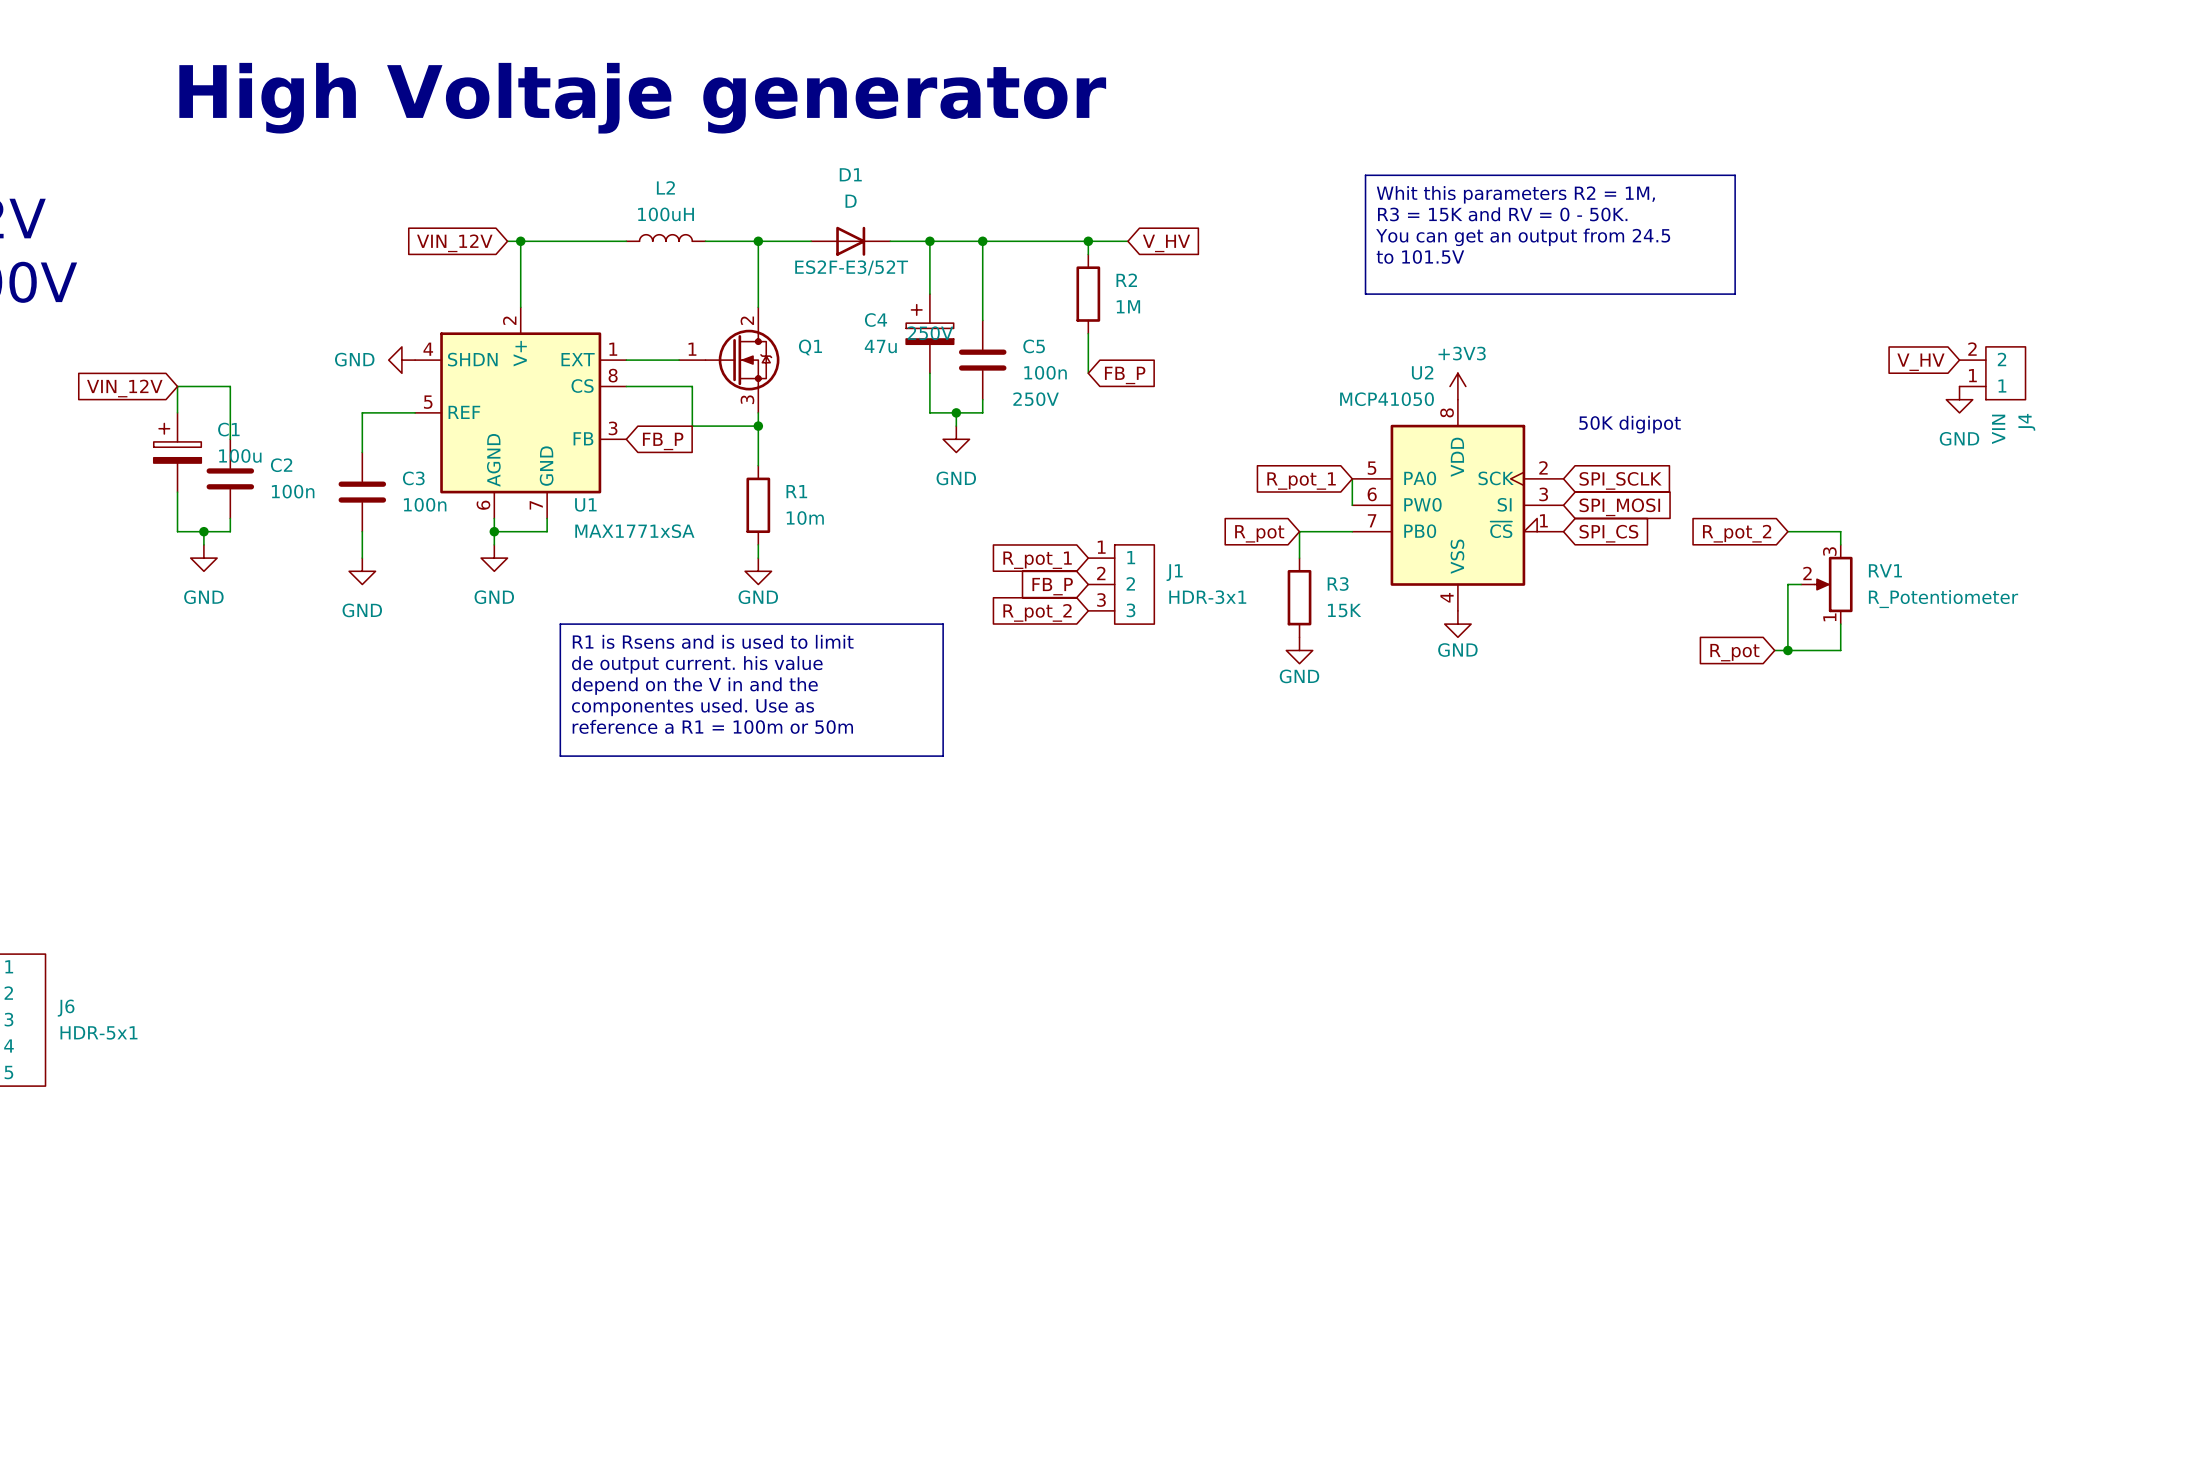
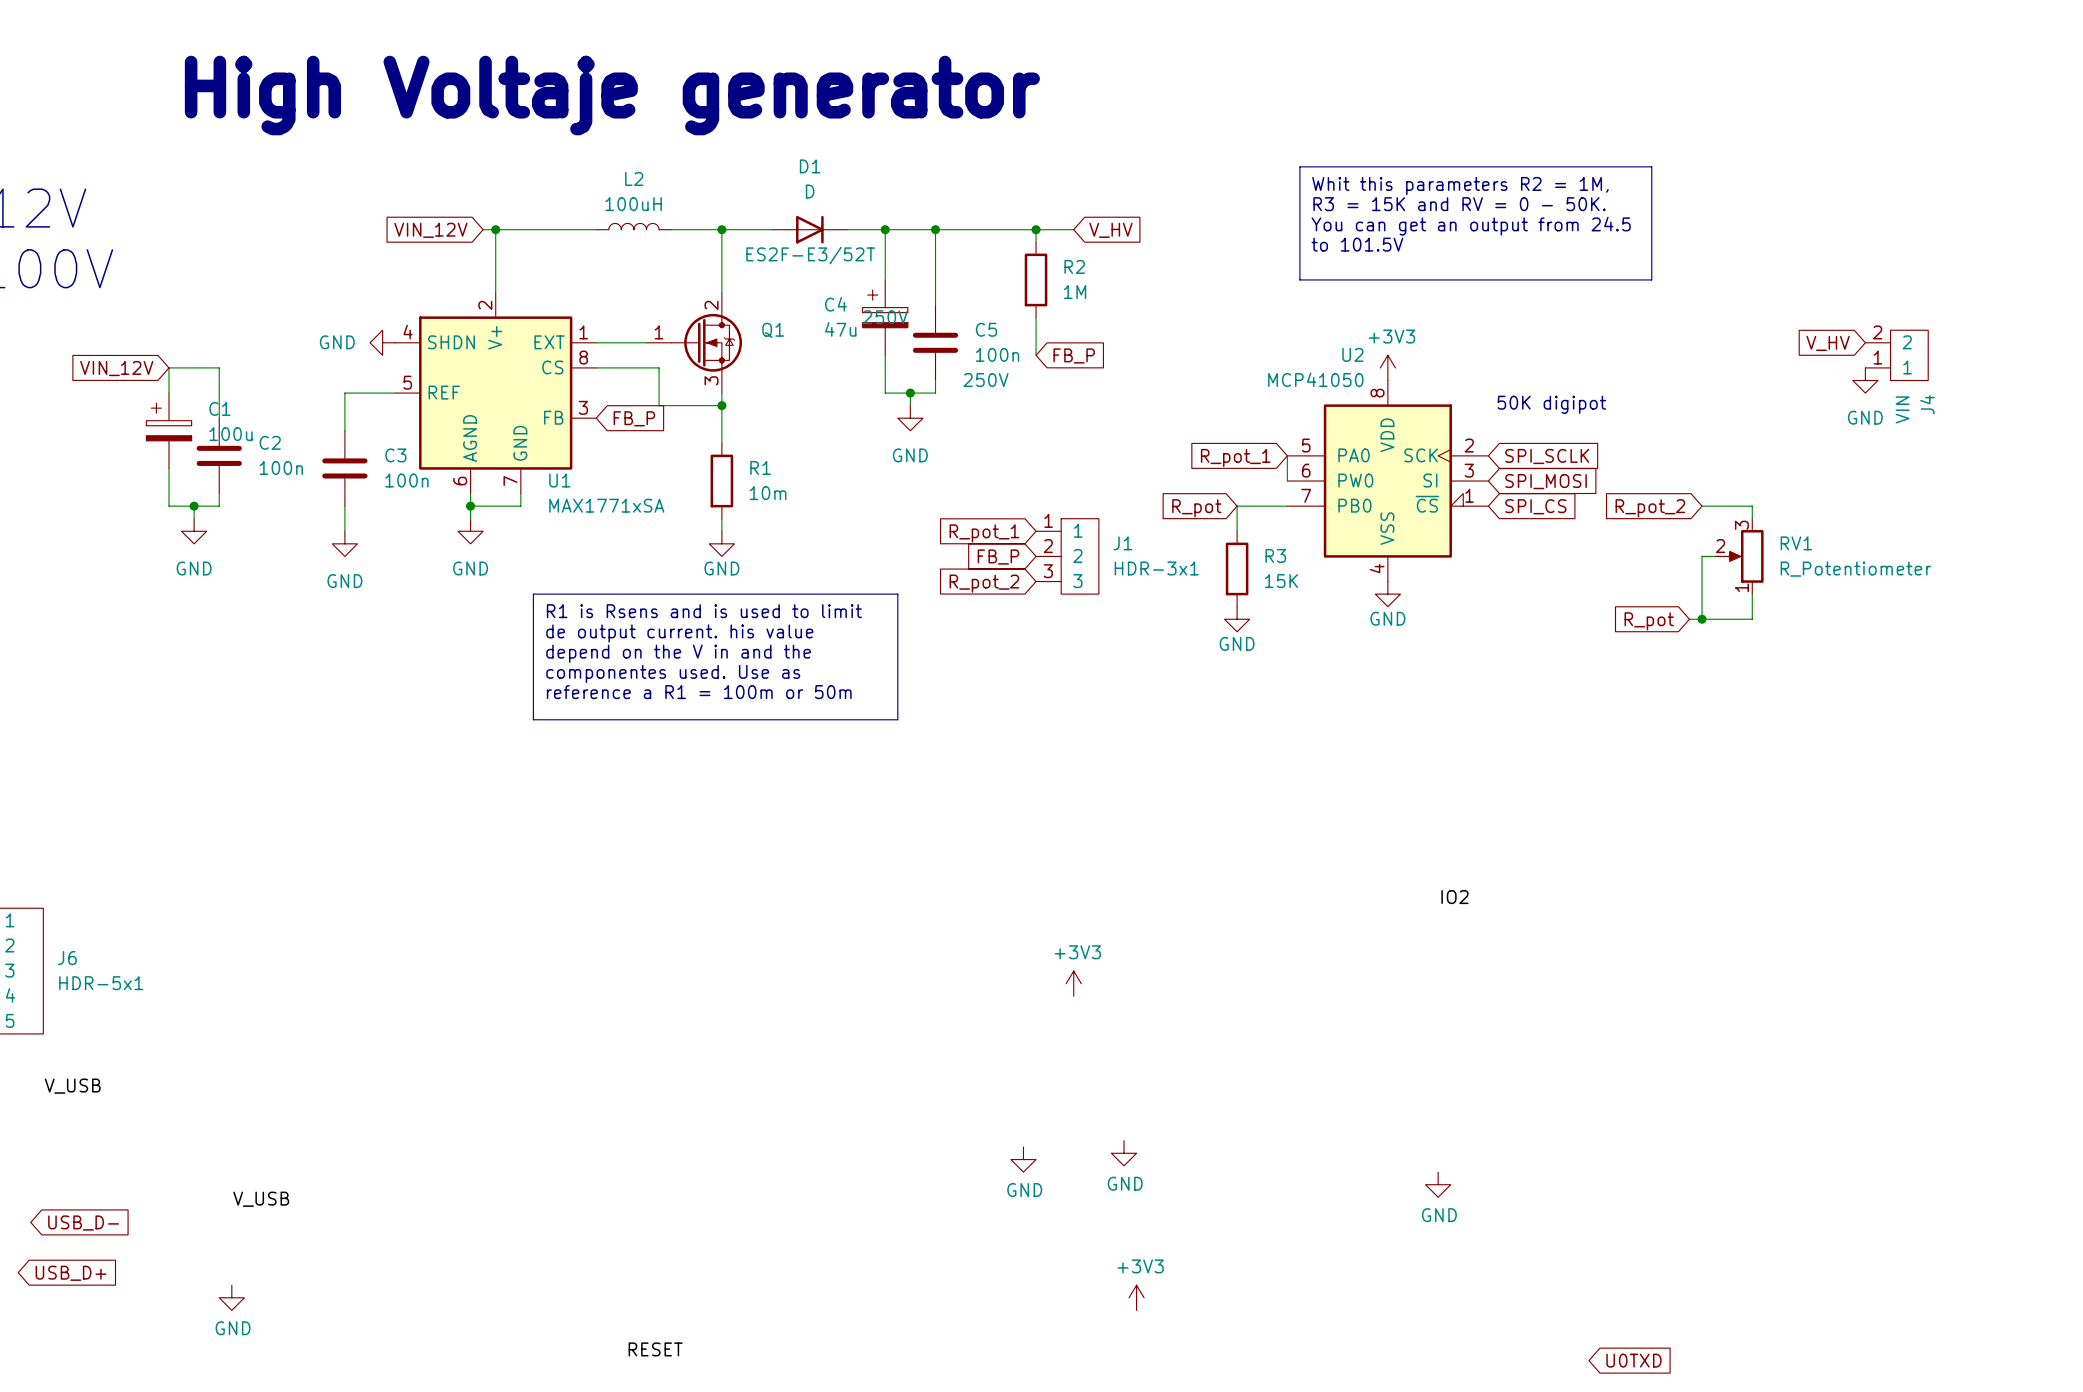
label: none -> IO2 (1454, 897)
power symbol: none -> +3V3 (1073, 983)
label: none -> V_USB (72, 1086)
power symbol: none -> GND (1123, 1153)
power symbol: none -> GND (1023, 1159)
power symbol: none -> GND (1438, 1184)
label: none -> V_USB (261, 1199)
global label: none -> USB_D- (83, 1223)
global label: none -> USB_D+ (71, 1273)
power symbol: none -> GND (231, 1297)
power symbol: none -> +3V3 (1136, 1297)
label: none -> RESET (655, 1349)
global label: none -> U0TXD (1633, 1360)

